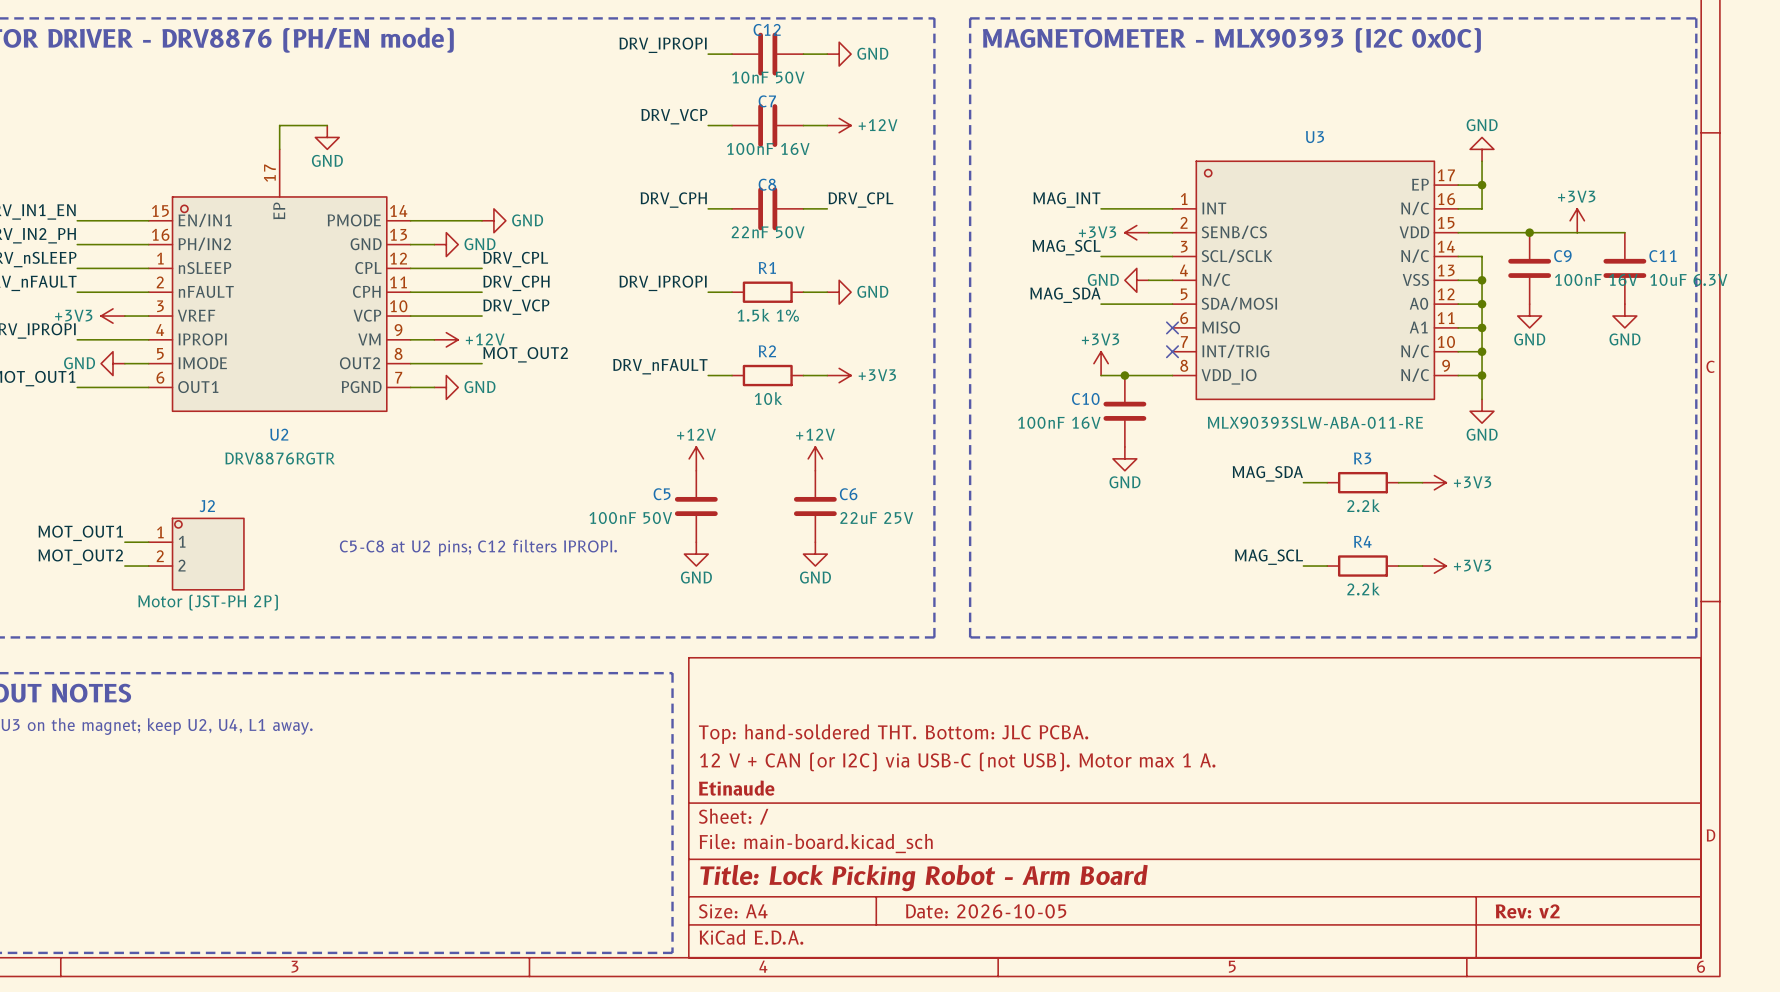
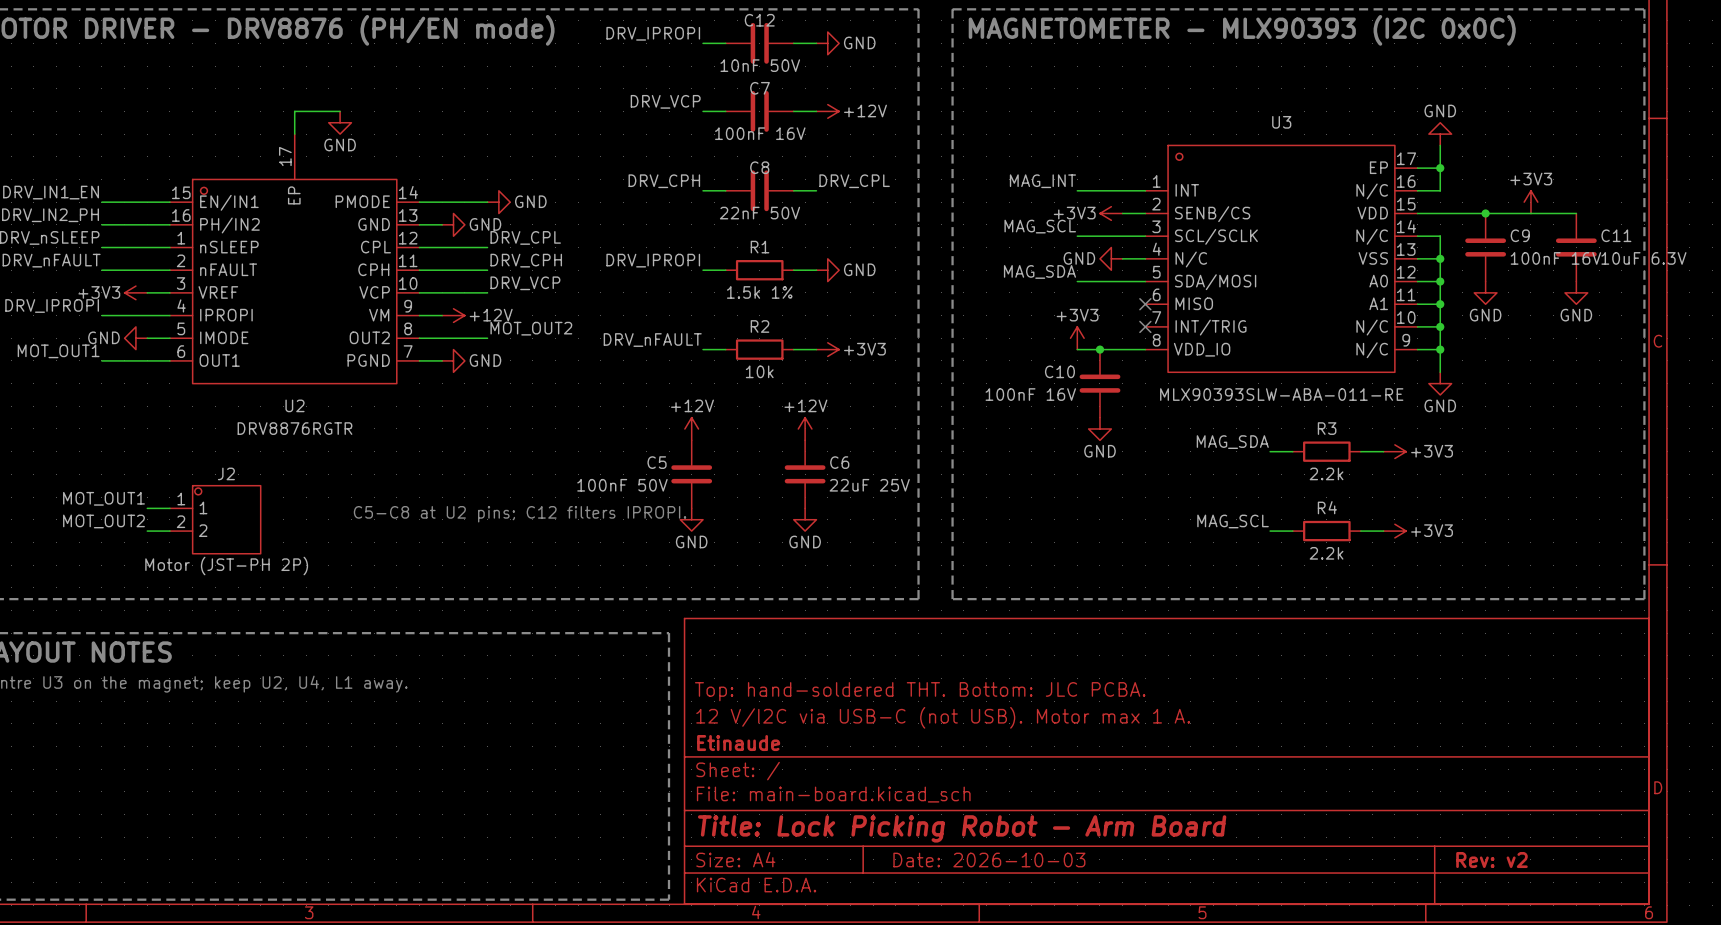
title block: 12 V + CAN (or I2C) via USB-C (not USB). Motor max 1 A. (957, 761) -> 12 V/I2C via USB-C (not USB). Motor max 1 A. (943, 717)
title block: Date: 2026-10-05 (986, 911) -> Date: 2026-10-03 (989, 860)

